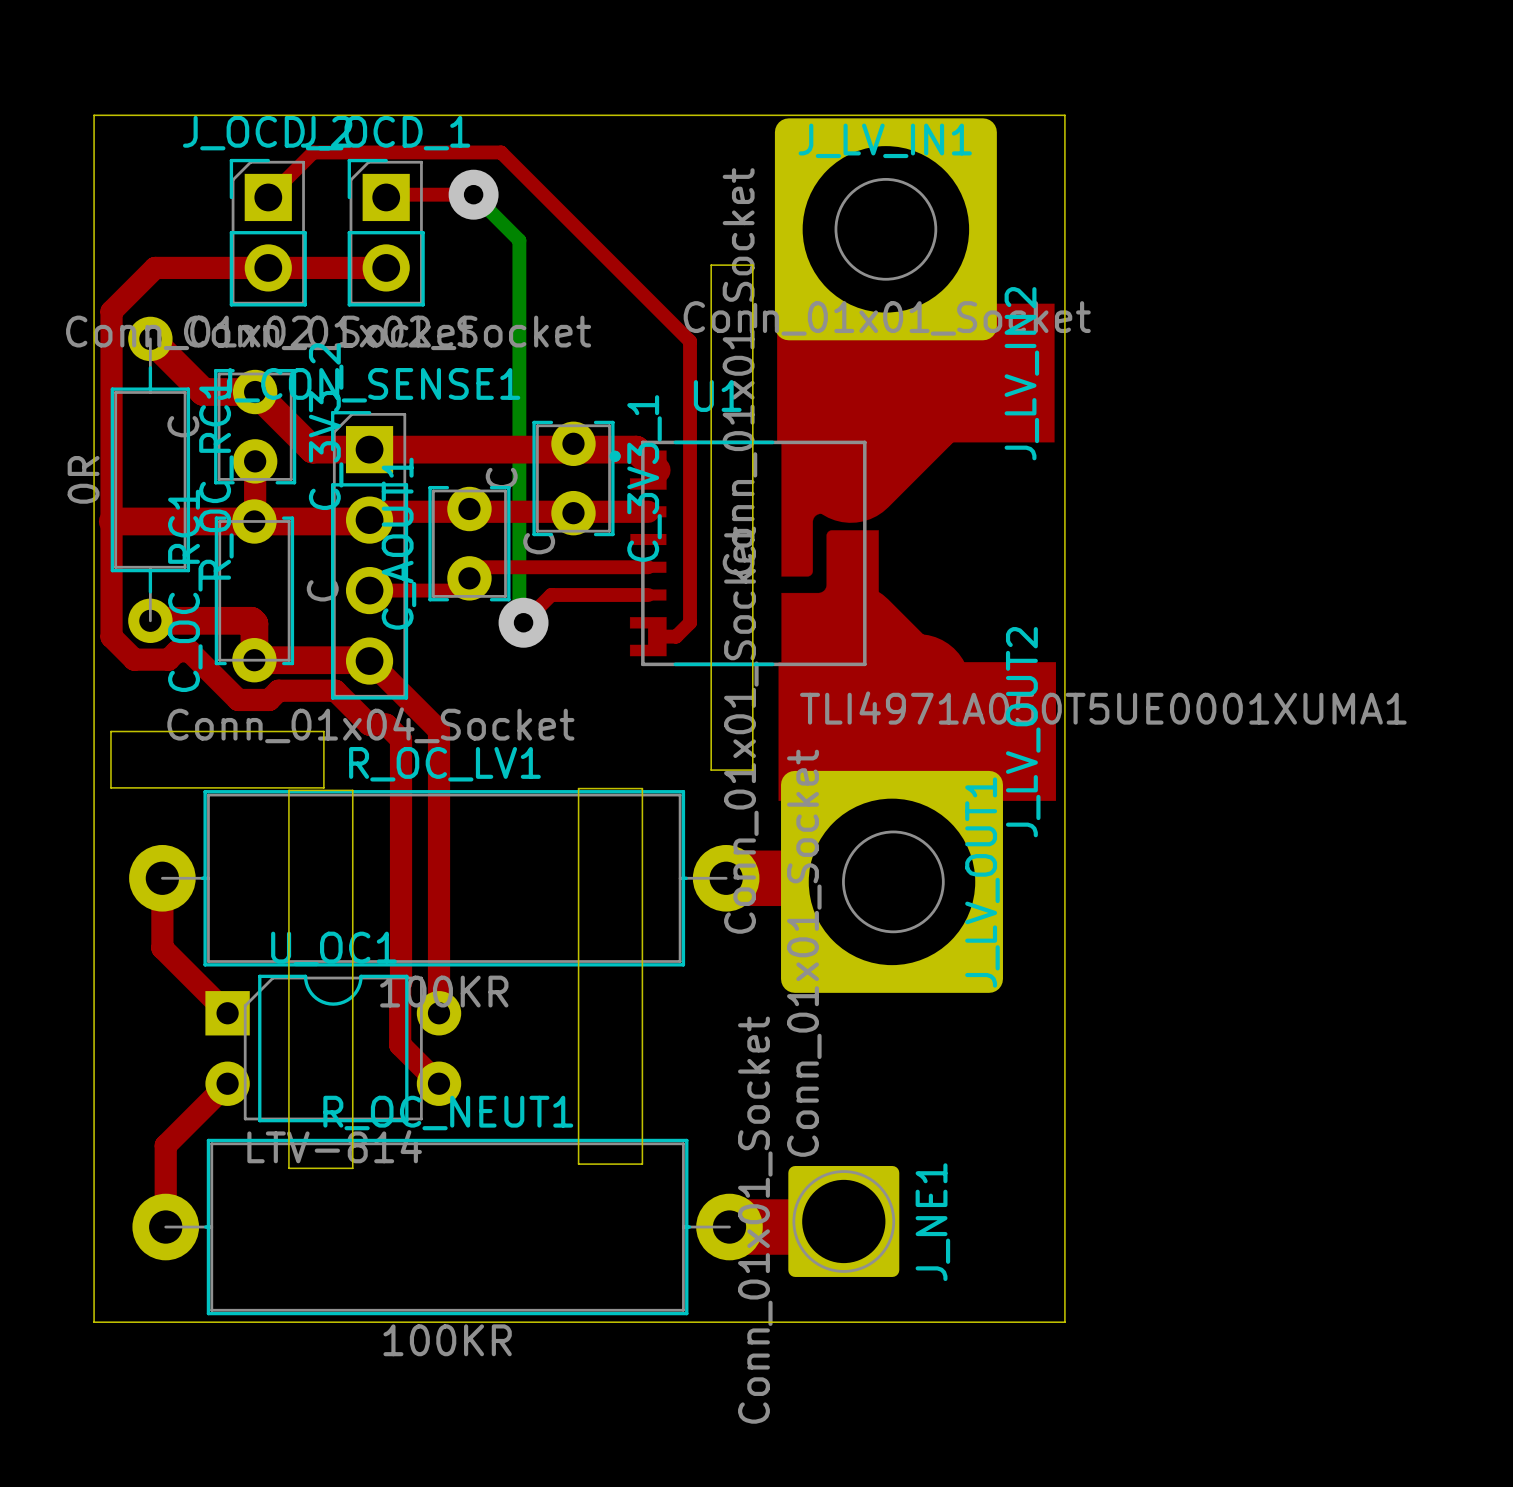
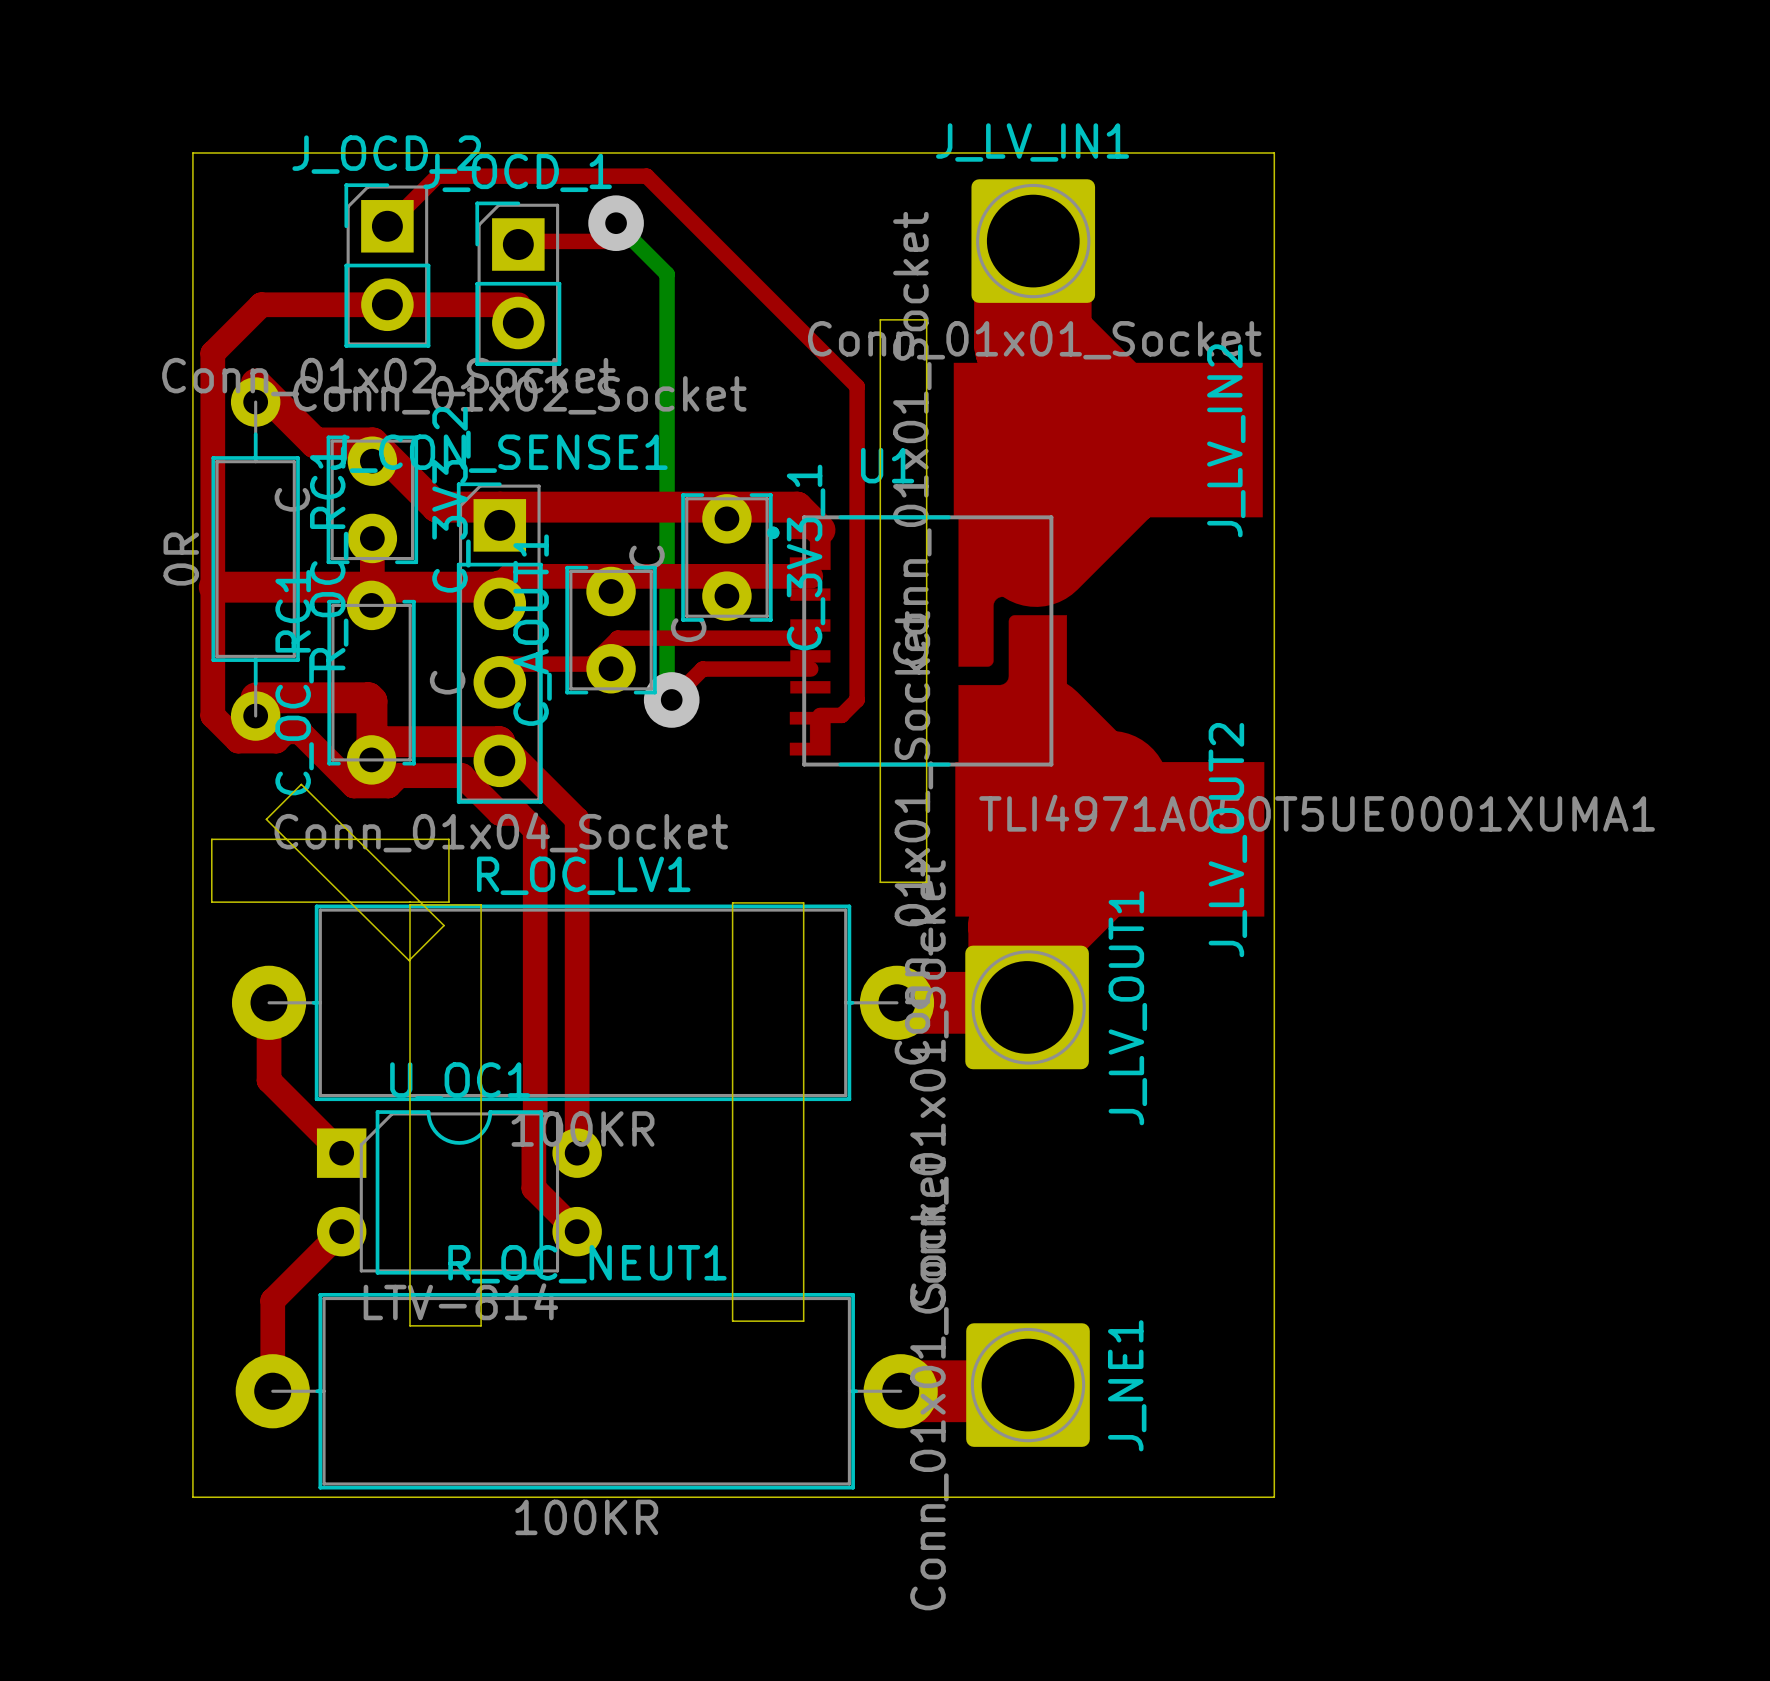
J_LV_IN1 footprint: [774, 118, 997, 341] -> [971, 179, 1096, 303]
bottom track: (473, 194) (519, 240) (519, 618) (523, 622) -> (616, 223) (667, 274) (667, 695) (671, 699)
via position: (473, 194) -> (616, 223)
top track: (268, 197) (313, 152) (501, 152) (690, 341) (690, 622) (676, 636) (656, 636) -> (387, 226) (437, 176) (646, 176) (857, 386) (857, 699) (841, 715) (820, 715)
J_OCD_2 position: (268, 232) -> (387, 265)
top track: (386, 267) (155, 267) (111, 311) (111, 520) -> (518, 304) (261, 304) (212, 353) (212, 585)
top track: (150, 338) (203, 392) (255, 392) (312, 449) (636, 449) (656, 470) -> (256, 383) (315, 442) (372, 442) (436, 507) (797, 507) (820, 530)
top track: (648, 511) (377, 511) (368, 521) (111, 522) (111, 636) (134, 659) (168, 659) (176, 651) (190, 651) (238, 699) (269, 699) (278, 690) (335, 690) (369, 724) (386, 724) (401, 739) (401, 981) -> (810, 576) (509, 576) (498, 587) (212, 588) (212, 715) (238, 741) (276, 741) (285, 731) (300, 731) (353, 785) (388, 785) (398, 775) (462, 775) (499, 813) (518, 813) (535, 829) (535, 1117)
top track: (648, 567) (474, 567) (451, 590) (369, 590) -> (810, 638) (617, 638) (591, 664) (500, 664)
top track: (648, 595) (551, 595) (523, 622) -> (810, 669) (702, 669) (671, 699)
top track: (150, 620) (251, 620) (254, 623) (254, 660) (368, 660) (439, 730) -> (256, 697) (368, 697) (371, 701) (371, 741) (499, 741) (577, 819) (577, 838)
via position: (523, 622) -> (671, 699)
board edge: none -> (301, 784) (266, 819) (409, 960) (444, 925) (301, 784)
J_LV_OUT1 footprint: [781, 770, 1003, 993] -> [965, 945, 1089, 1070]

